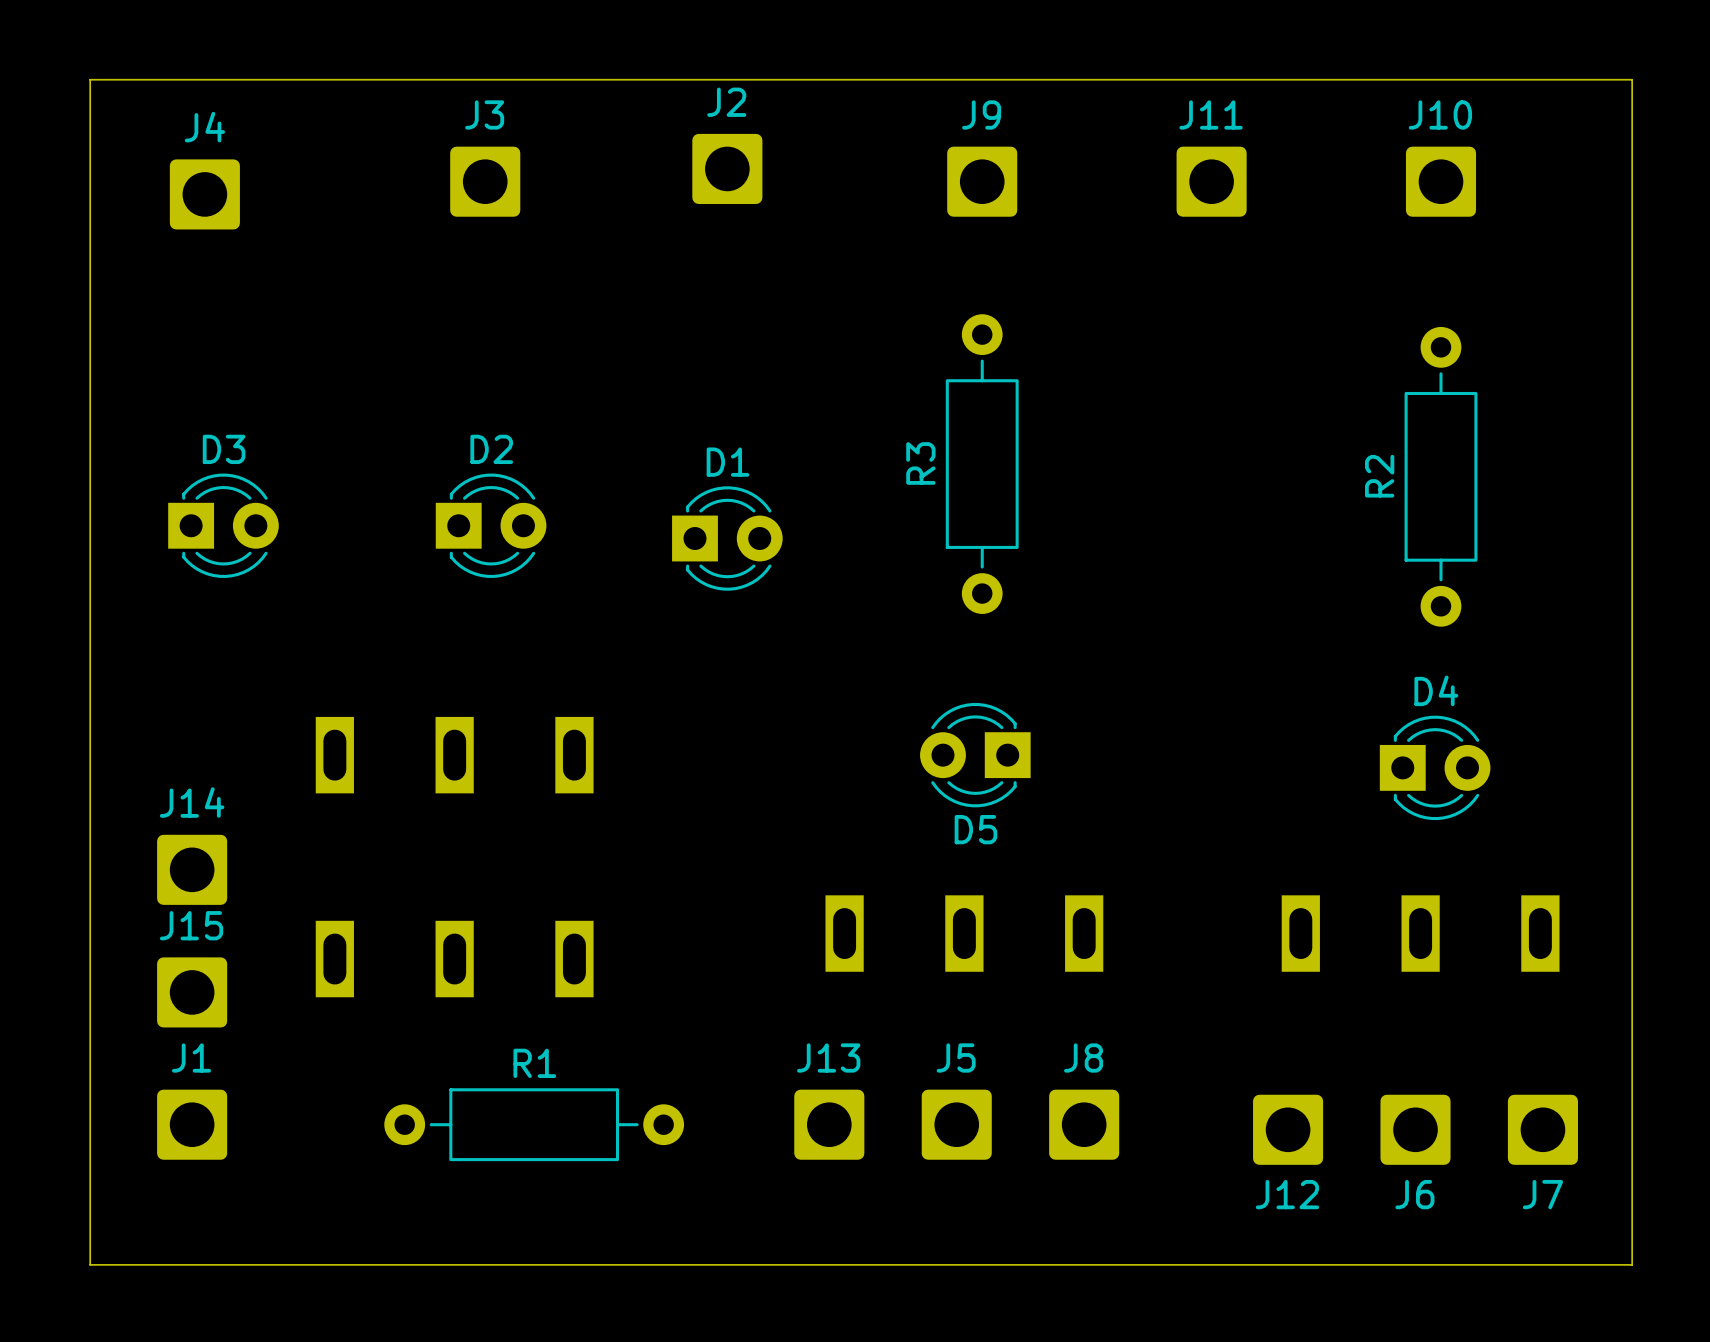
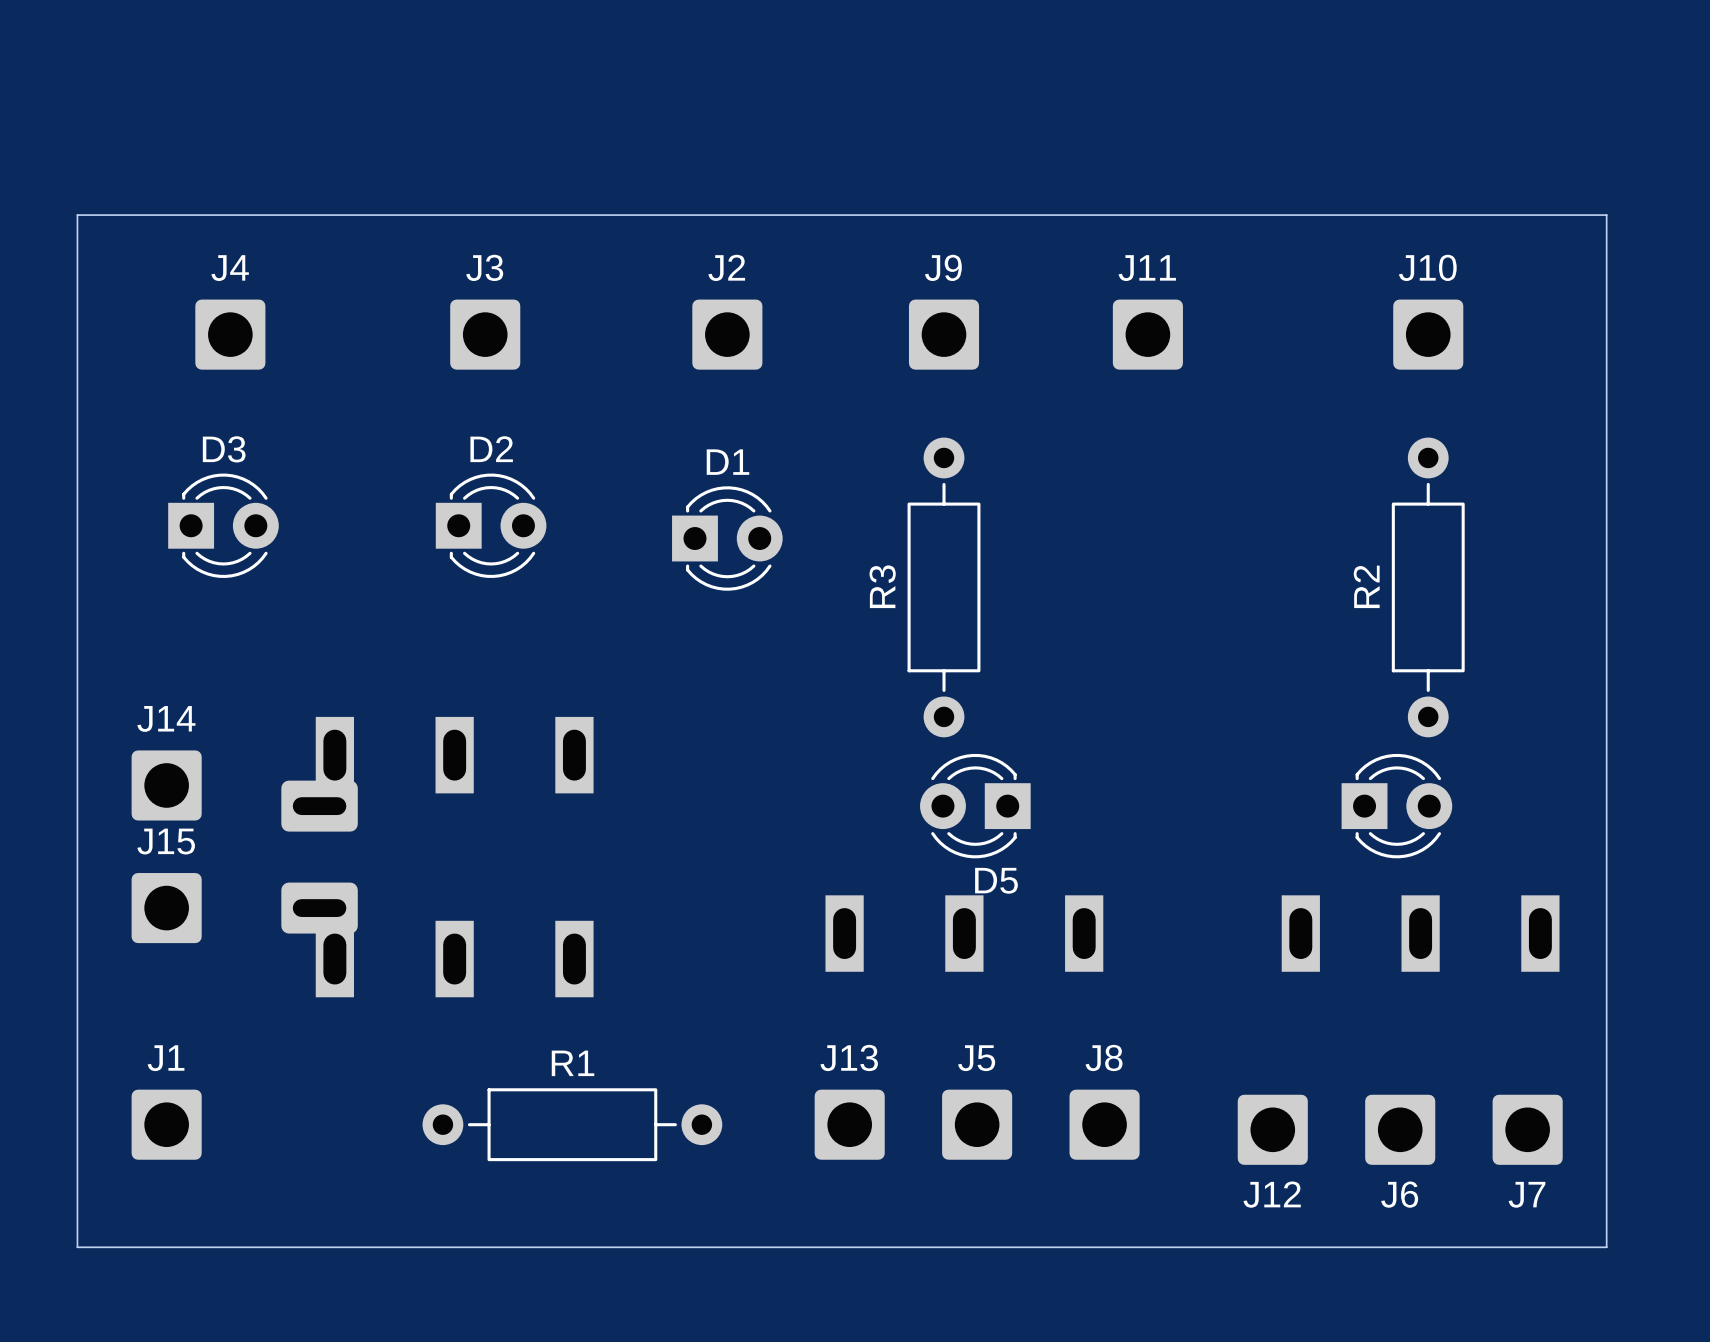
board edge: (90, 79) (1632, 79) (1632, 1264) (90, 1264) (90, 79) -> (77, 215) (77, 1247) (1606, 1247) (1606, 215) (77, 215)
J2 position: (727, 168) -> (727, 334)
J3 position: (485, 181) -> (485, 334)
J9 position: (982, 181) -> (944, 334)
J11 position: (1211, 181) -> (1147, 334)
J10 position: (1440, 181) -> (1428, 334)
J4 position: (204, 194) -> (230, 334)
R3 position: (982, 464) -> (944, 587)
R2 position: (1440, 476) -> (1428, 587)
D5 position: (975, 755) -> (975, 806)
D4: (1435, 767) -> none
part: none -> (1396, 806)
D5 name position: D5 (975, 829) -> D5 (996, 880)
part: none -> (319, 857)
J14 position: (192, 869) -> (166, 785)
J15 position: (192, 992) -> (166, 908)
J1 position: (192, 1124) -> (166, 1124)
R1 position: (534, 1124) -> (572, 1124)
J13 position: (829, 1124) -> (849, 1124)
J5 position: (956, 1124) -> (977, 1124)
J8 position: (1084, 1124) -> (1104, 1124)
J12 position: (1288, 1129) -> (1272, 1129)
J6 position: (1415, 1129) -> (1400, 1129)
J7 position: (1542, 1129) -> (1527, 1129)

